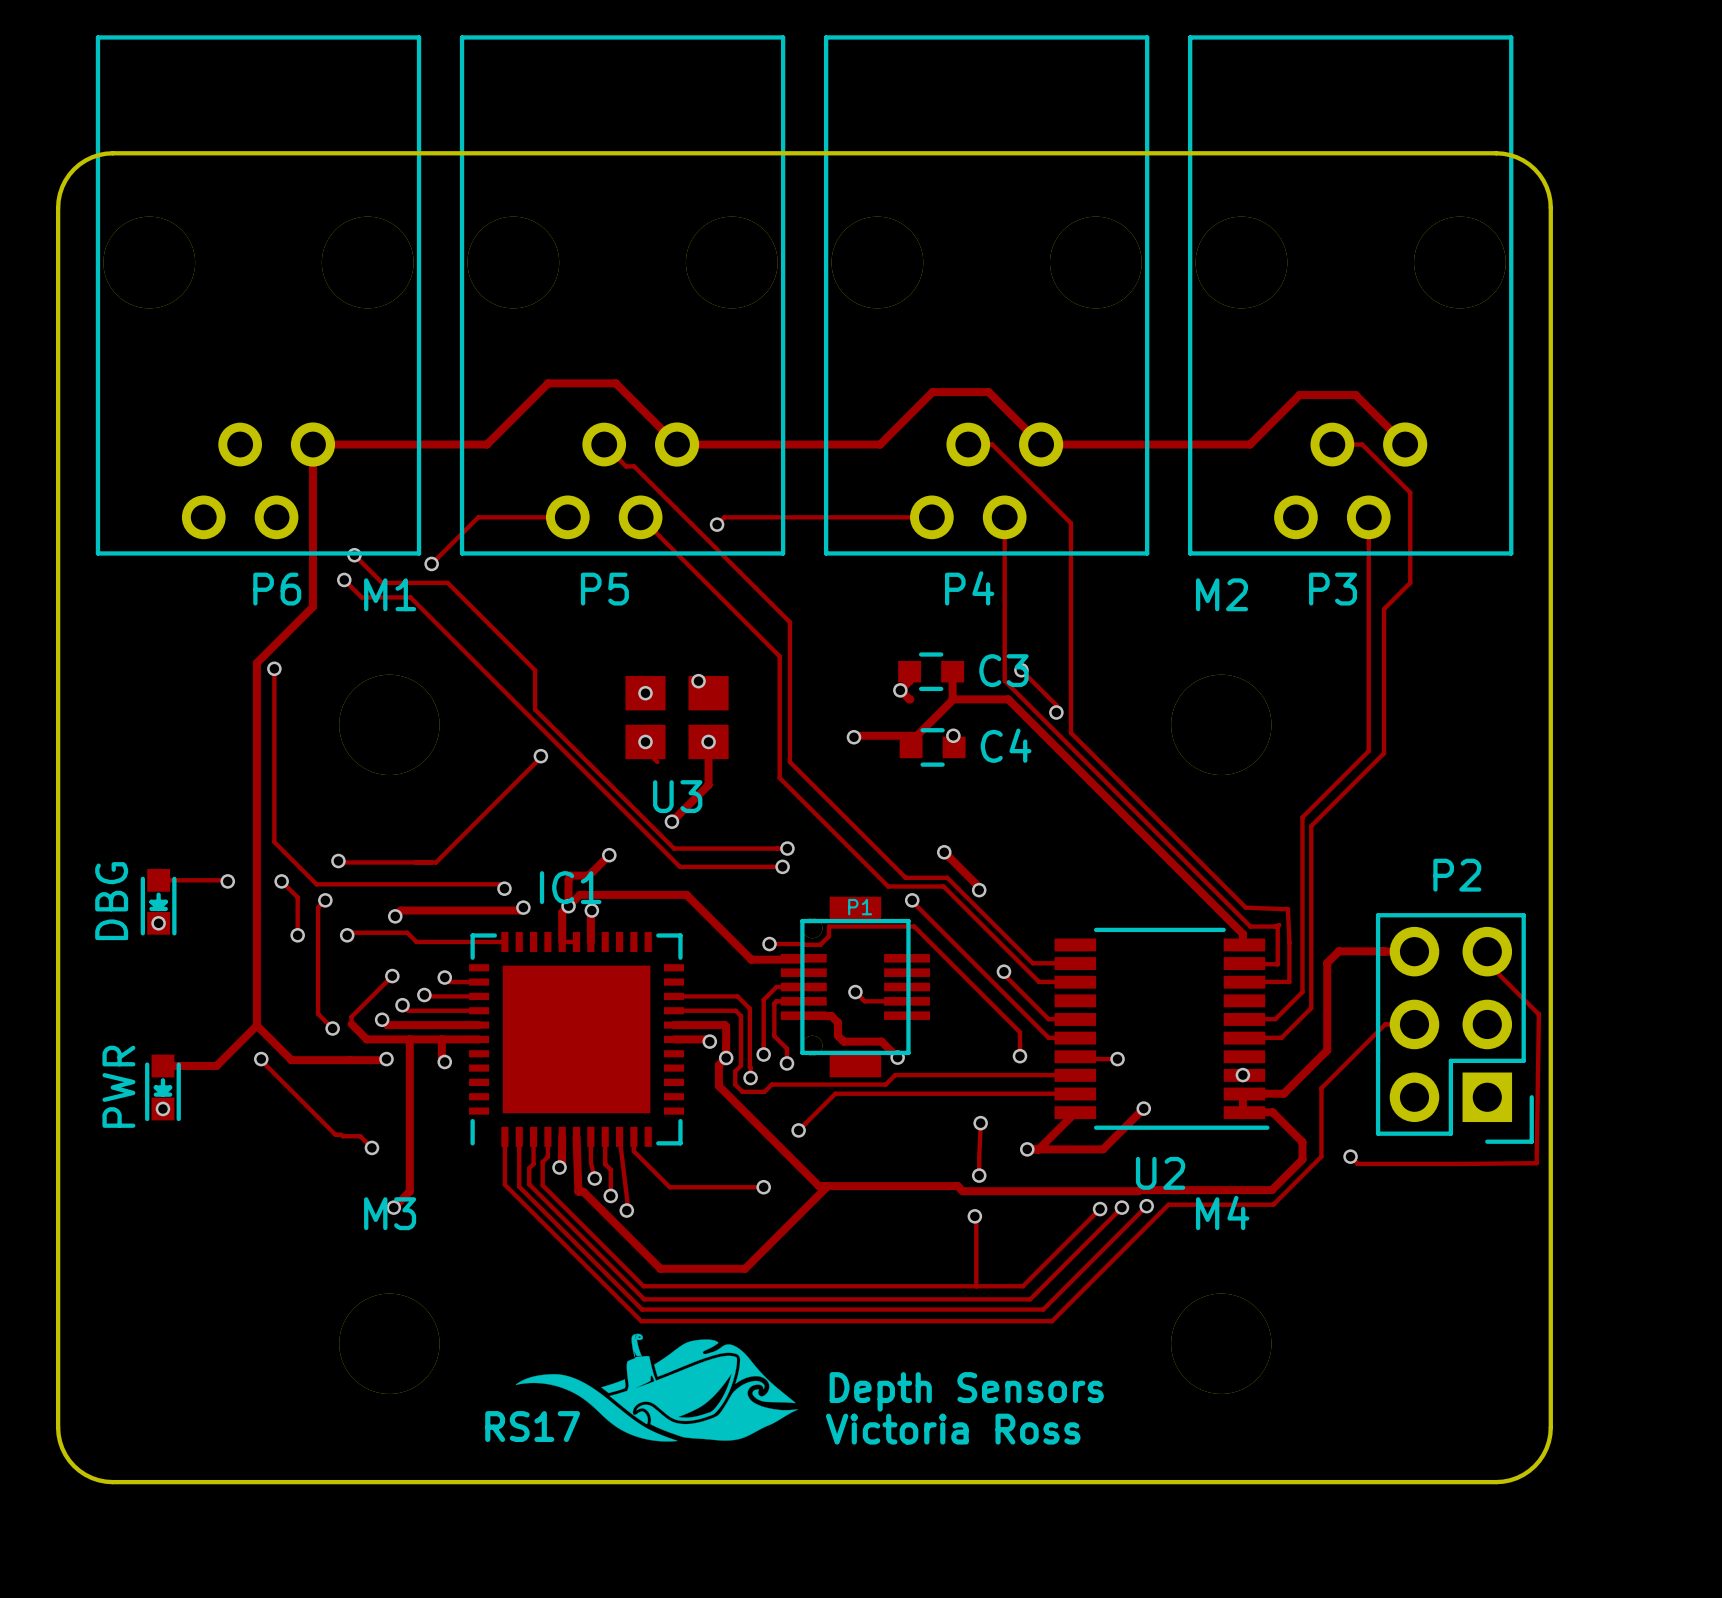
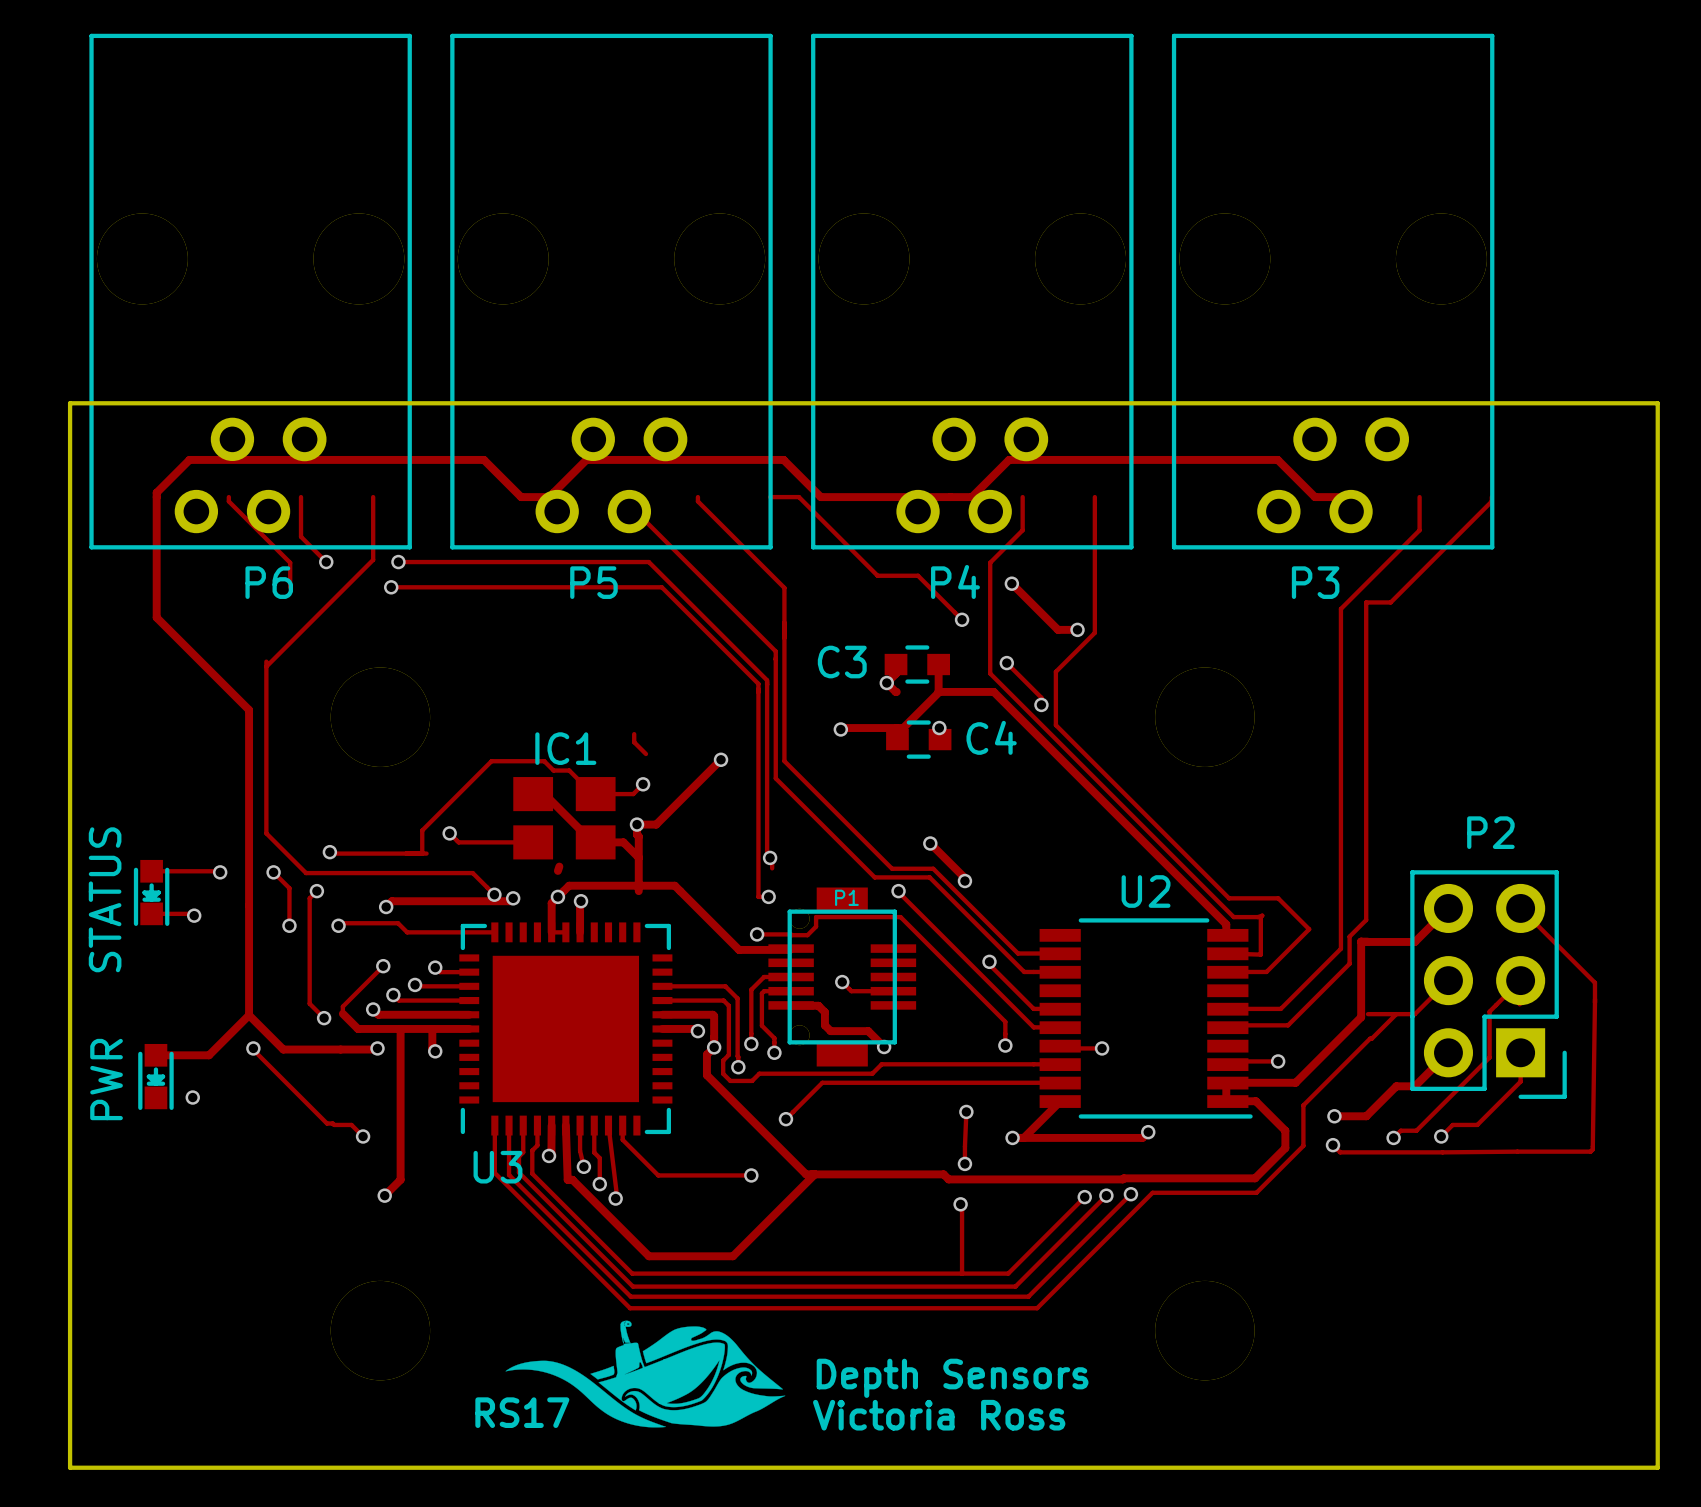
track: (604, 444) (626, 466) (634, 466) (789, 622) (789, 762) (797, 769) -> (697, 497) (697, 501) (784, 587) (784, 761)
track: (968, 444) (992, 444) (1070, 523) (1070, 679) -> (1094, 497) (1094, 632) (1055, 671)
track: (1332, 444) (1362, 444) (1410, 492) (1410, 582) (1384, 609) -> (1491, 497) (1491, 501) (1390, 602) (1366, 602)
track: (1405, 444) (1355, 395) (1299, 395) (1250, 444) (1041, 444) (988, 392) (932, 392) (880, 444) (677, 444) (615, 383) (548, 383) (486, 444) (312, 444) (312, 606) (256, 662) (256, 717) -> (1347, 497) (1314, 497) (1277, 459) (1009, 459) (971, 497) (820, 497) (783, 459) (586, 459) (553, 492) (553, 497) (521, 497) (483, 459) (189, 459) (156, 492) (156, 617) (249, 709)
track: none -> (228, 497) (228, 501) (290, 562) (290, 587)
track: none -> (301, 497) (301, 536) (326, 562)
track: none -> (373, 497) (373, 559) (266, 666)
track: none -> (770, 497) (798, 497) (877, 575) (918, 575) (962, 619)
track: (567, 517) (478, 517) (431, 563) -> none
track: (640, 517) (779, 656) (779, 778) (788, 786) -> (625, 497) (625, 501) (775, 651) (775, 778)
track: (931, 517) (724, 517) (717, 524) -> none
track: (1004, 517) (1004, 569) -> (1022, 497) (1022, 530) (990, 562)
track: (1368, 517) (1368, 751) (1302, 817) (1302, 992) (1275, 1019) -> (1419, 497) (1419, 530) (1340, 608) (1340, 948) (1280, 1008) (1258, 1008)
via: (717, 524) -> none
track: (354, 555) (382, 582) (447, 582) (535, 670) (535, 709) (674, 848) (787, 848) -> none
via: (354, 555) -> none
via: (431, 563) -> none
track: none -> (398, 562) (648, 562) (767, 680) (767, 853) (772, 858) (772, 868)
via: none -> (398, 562)
track: (344, 579) (361, 597) (410, 597) (679, 866) (782, 866) -> none
via position: (344, 579) -> (326, 562)
track: none -> (1011, 583) (1058, 629) (1077, 629)
via: none -> (1011, 583)
track: none -> (391, 587) (661, 587) (758, 683) (758, 896) (768, 896)
via: none -> (391, 587)
M1 name: M1 (390, 594) -> none
M2 name: M2 (1221, 594) -> none
via: none -> (962, 619)
via: none -> (1077, 629)
via: (274, 668) -> none
C3 name position: C3 (1003, 670) -> C3 (842, 662)
via: (698, 681) -> none
via: (645, 693) -> none
U3 position: (677, 717) -> (564, 818)
via: (645, 741) -> none
track: (708, 741) (708, 785) (671, 821) -> none
via position: (708, 741) -> (721, 759)
track: (1384, 753) (1311, 826) (1311, 1008) (1281, 1037) (1242, 1037) (1244, 1035) -> (1366, 745) (1366, 920) (1349, 936) (1349, 963) (1288, 1025) (1228, 1025)
track: (540, 756) (436, 862) -> none
via: (540, 756) -> none
track: none -> (721, 759) (656, 824) (637, 824) (638, 891)
track: none -> (643, 784) (633, 794) (592, 794) (569, 770) (553, 770) (544, 761) (491, 761) (422, 830) (422, 853)
via: none -> (643, 784)
U3 name position: U3 (677, 796) -> U3 (497, 1167)
track: none -> (533, 794) (544, 794) (592, 842) (623, 842) (638, 857)
via: (671, 821) -> none
via: none -> (637, 824)
track: none -> (449, 833) (458, 842) (533, 842)
via: none -> (449, 833)
via: (787, 848) -> none
track: (609, 855) (588, 875) (570, 875) -> none
via: (609, 855) -> none
track: (568, 879) (568, 906) -> none
track: (314, 882) (316, 884) (500, 884) (504, 888) -> (306, 873) (472, 873) (494, 894)
IC1 name position: IC1 (570, 887) -> IC1 (565, 748)
via position: (504, 888) -> (494, 894)
DBG name: DBG (111, 901) -> none
via: none -> (768, 896)
track: (1245, 907) (1287, 909) (1289, 981) (1283, 981) -> (1229, 898) (1278, 898) (1309, 929) (1266, 971)
text: none -> STATUS (105, 899)
track: none -> (1448, 908) (1414, 941) (1396, 941)
track: none -> (1520, 908) (1594, 982) (1594, 1002)
track: none -> (151, 913) (192, 913) (194, 915)
via position: (158, 923) -> (194, 915)
track: (1378, 951) (1338, 951) (1327, 962) (1327, 1050) (1283, 1093) -> (1361, 941) (1361, 1017) (1295, 1082) (1266, 1082)
track: (1487, 951) (1487, 962) (1538, 1014) (1536, 1163) -> (1595, 999) (1592, 1149) (1590, 1151) (1517, 1151)
track: none -> (1520, 980) (1489, 1011) (1489, 1057) (1416, 1130) (1400, 1130) (1393, 1137)
track: (1385, 1024) (1321, 1088) (1320, 1157) -> (1448, 980) (1414, 1014) (1396, 1014) (1303, 1105) (1303, 1145)
P2 position: (1454, 1028) -> (1488, 984)
track: none -> (1448, 1052) (1414, 1086) (1396, 1086) (1366, 1116) (1334, 1116)
track: none -> (1520, 1052) (1520, 1081) (1477, 1124) (1452, 1124) (1441, 1136)
track: none -> (1278, 1061) (1231, 1061) (1227, 1064)
via: none -> (1278, 1061)
via: (1242, 1075) -> none
PWR name: PWR (118, 1086) -> none
text: none -> PWR (106, 1079)
via position: (162, 1108) -> (192, 1097)
track: (1143, 1108) (1102, 1149) -> (1148, 1132) (1142, 1137) (1087, 1137)
via position: (1143, 1108) -> (1148, 1132)
via: none -> (1334, 1116)
via: none -> (1441, 1136)
via: none -> (1393, 1137)
U2 name position: U2 (1160, 1173) -> U2 (1146, 891)
M3 name: M3 (390, 1213) -> none
M4 name: M4 (1222, 1213) -> none
board edge: (112, 1482) (91, 1477) (74, 1466) (62, 1448) (58, 1427) (58, 207) (62, 186) (74, 169) (91, 157) (112, 153) (1496, 153) (1517, 157) (1534, 169) (1546, 186) (1550, 207) (1550, 1427) (1546, 1448) (1534, 1466) (1517, 1477) (1496, 1482) -> (106, 1467) (70, 1467) (70, 403) (1657, 403) (1657, 1467) (1477, 1467)

